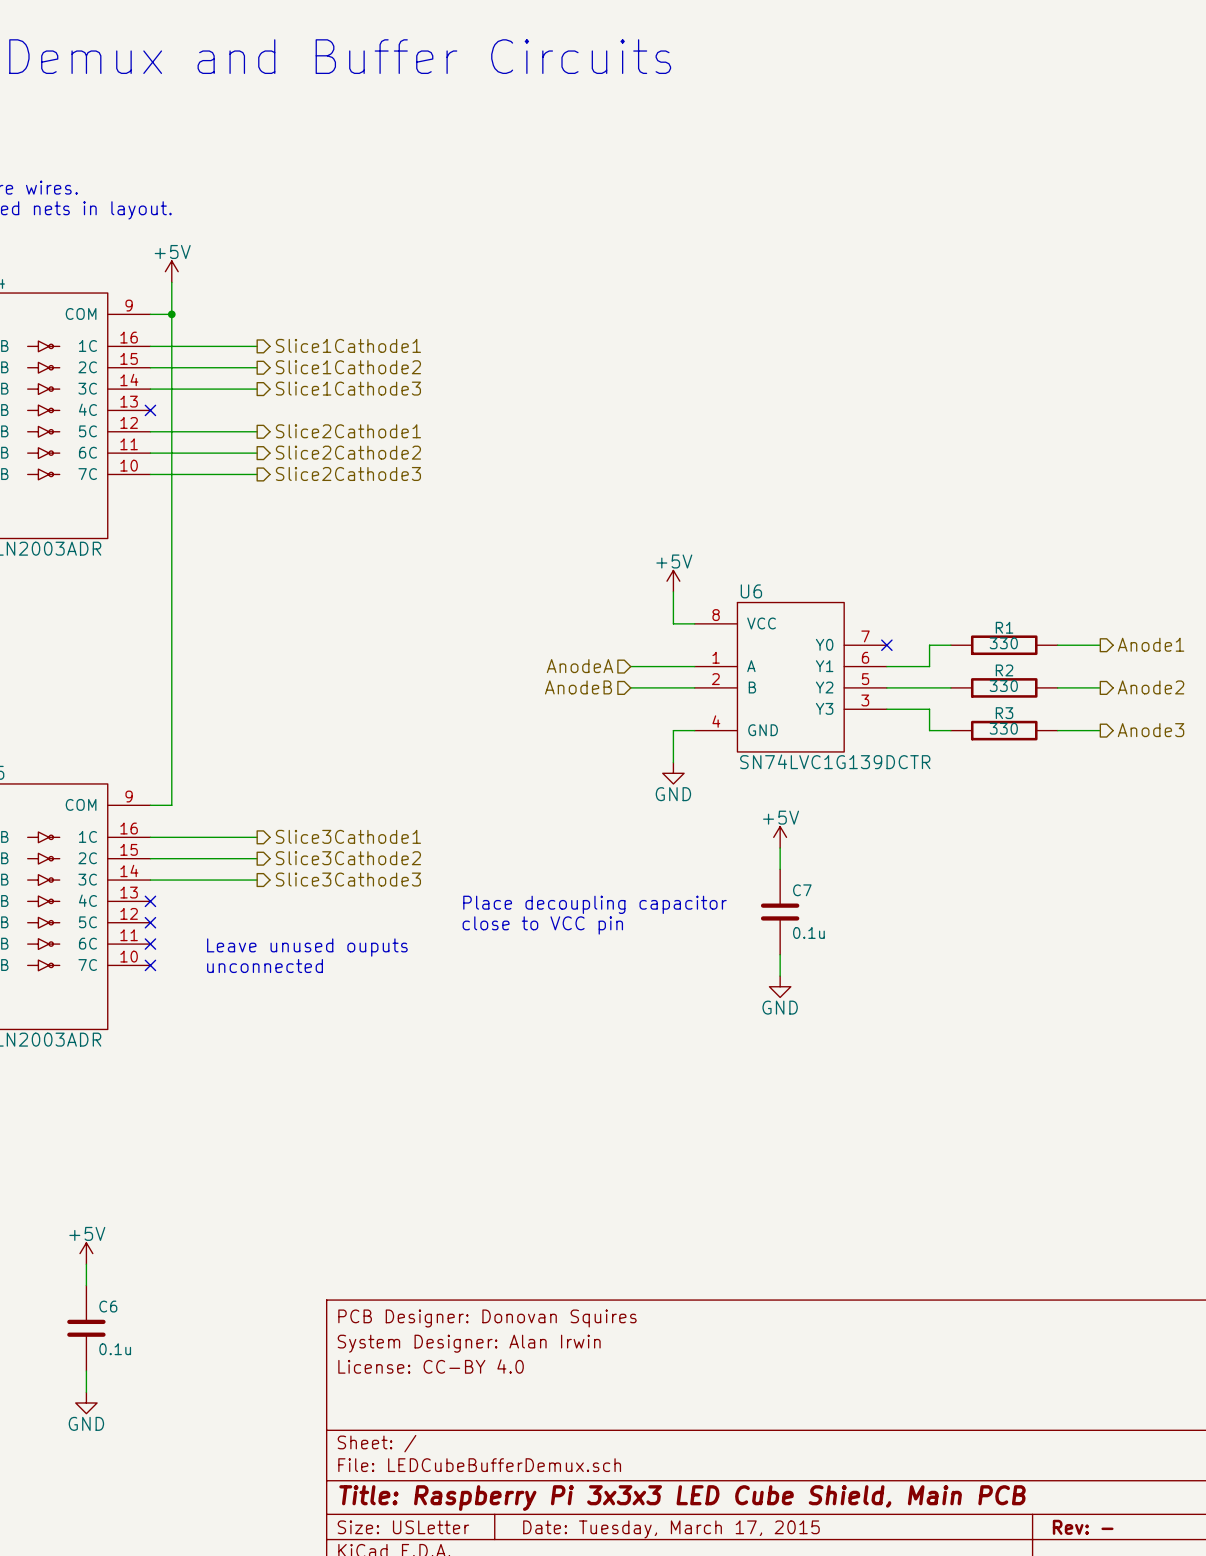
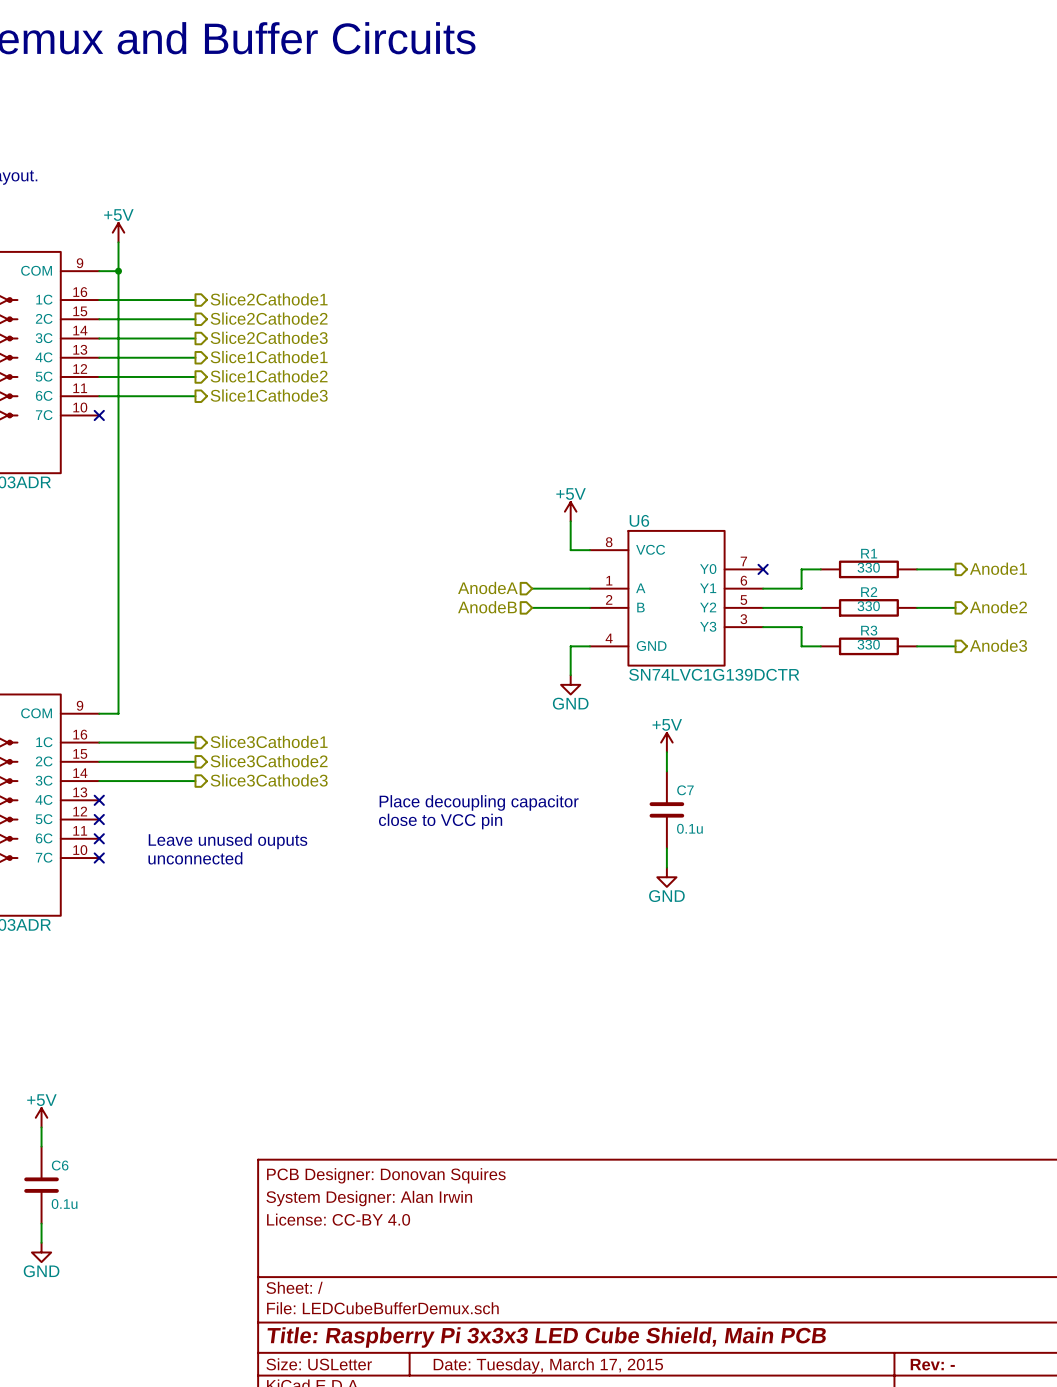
hierarchical label: Slice1Cathode1 (348, 345) -> Slice2Cathode1 (269, 299)
hierarchical label: Slice1Cathode2 (348, 367) -> Slice2Cathode2 (269, 318)
hierarchical label: Slice1Cathode3 (348, 388) -> Slice2Cathode3 (269, 337)
hierarchical label: none -> Slice1Cathode1 (269, 357)
no-connect mark: (150, 410) -> none
hierarchical label: Slice2Cathode1 (348, 431) -> Slice1Cathode2 (269, 376)
hierarchical label: Slice2Cathode2 (348, 452) -> Slice1Cathode3 (269, 395)
hierarchical label: Slice2Cathode3 (348, 473) -> none
wire: (150, 474) (257, 474) -> (99, 357) (195, 357)
no-connect mark: none -> (99, 415)

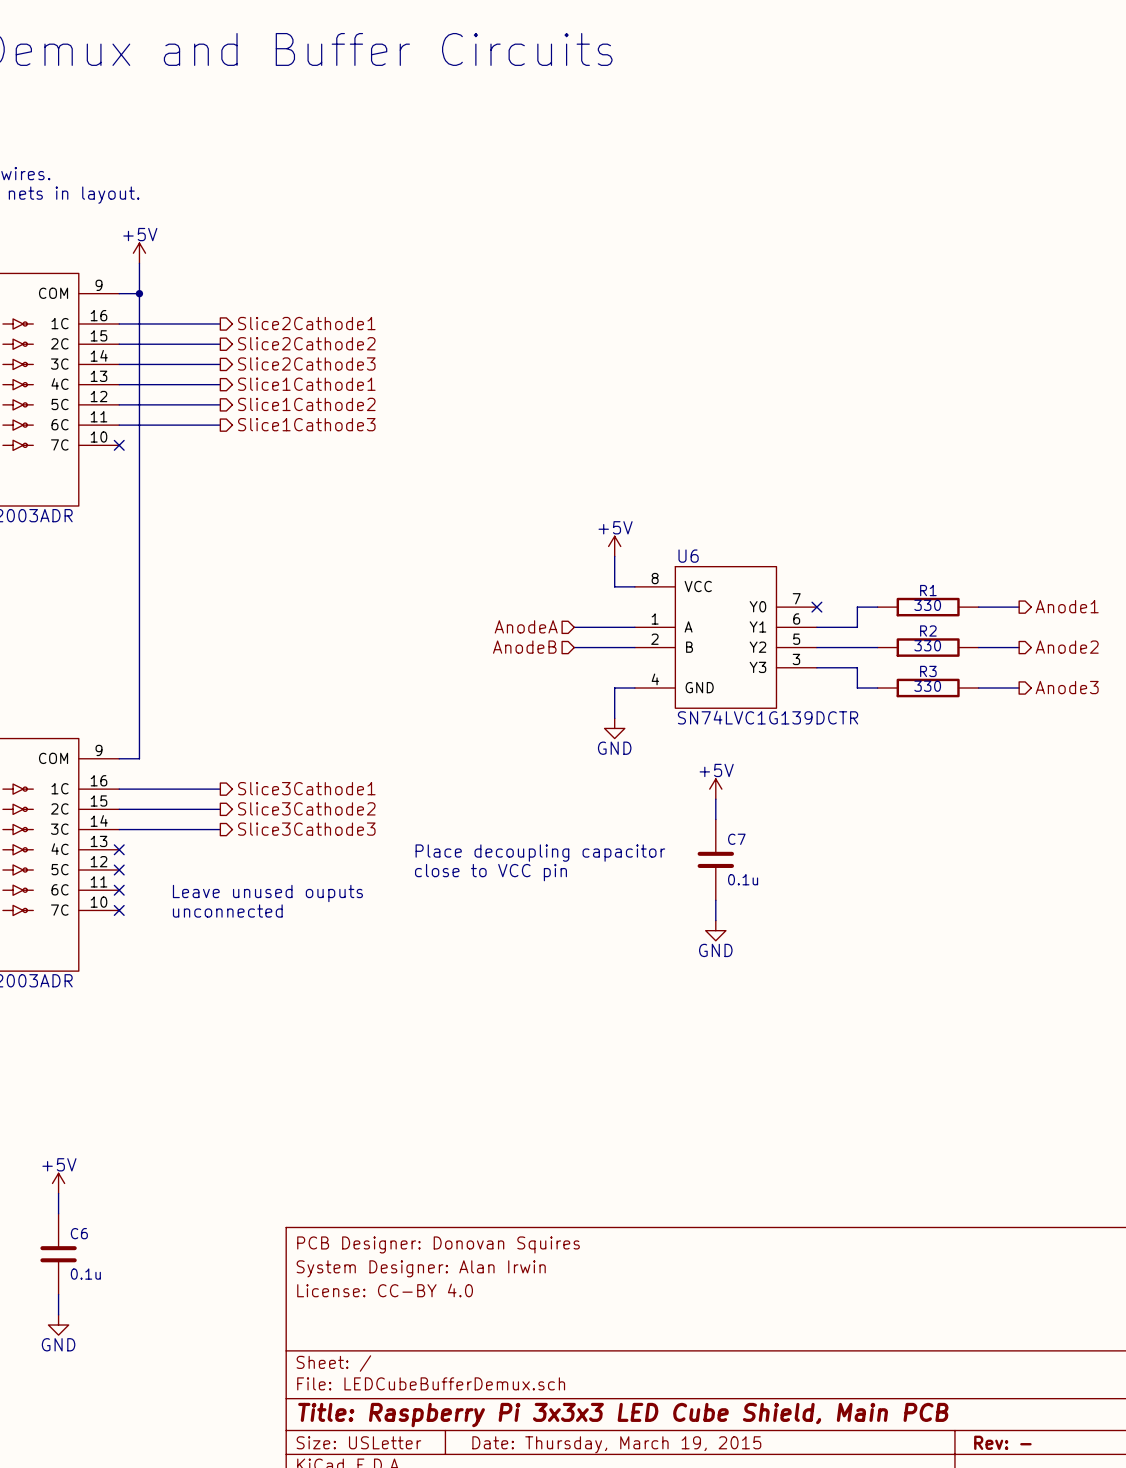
title block: Date: Tuesday, March 17, 2015 (548, 1365) -> Date: Thursday, March 19, 2015 (616, 1444)

